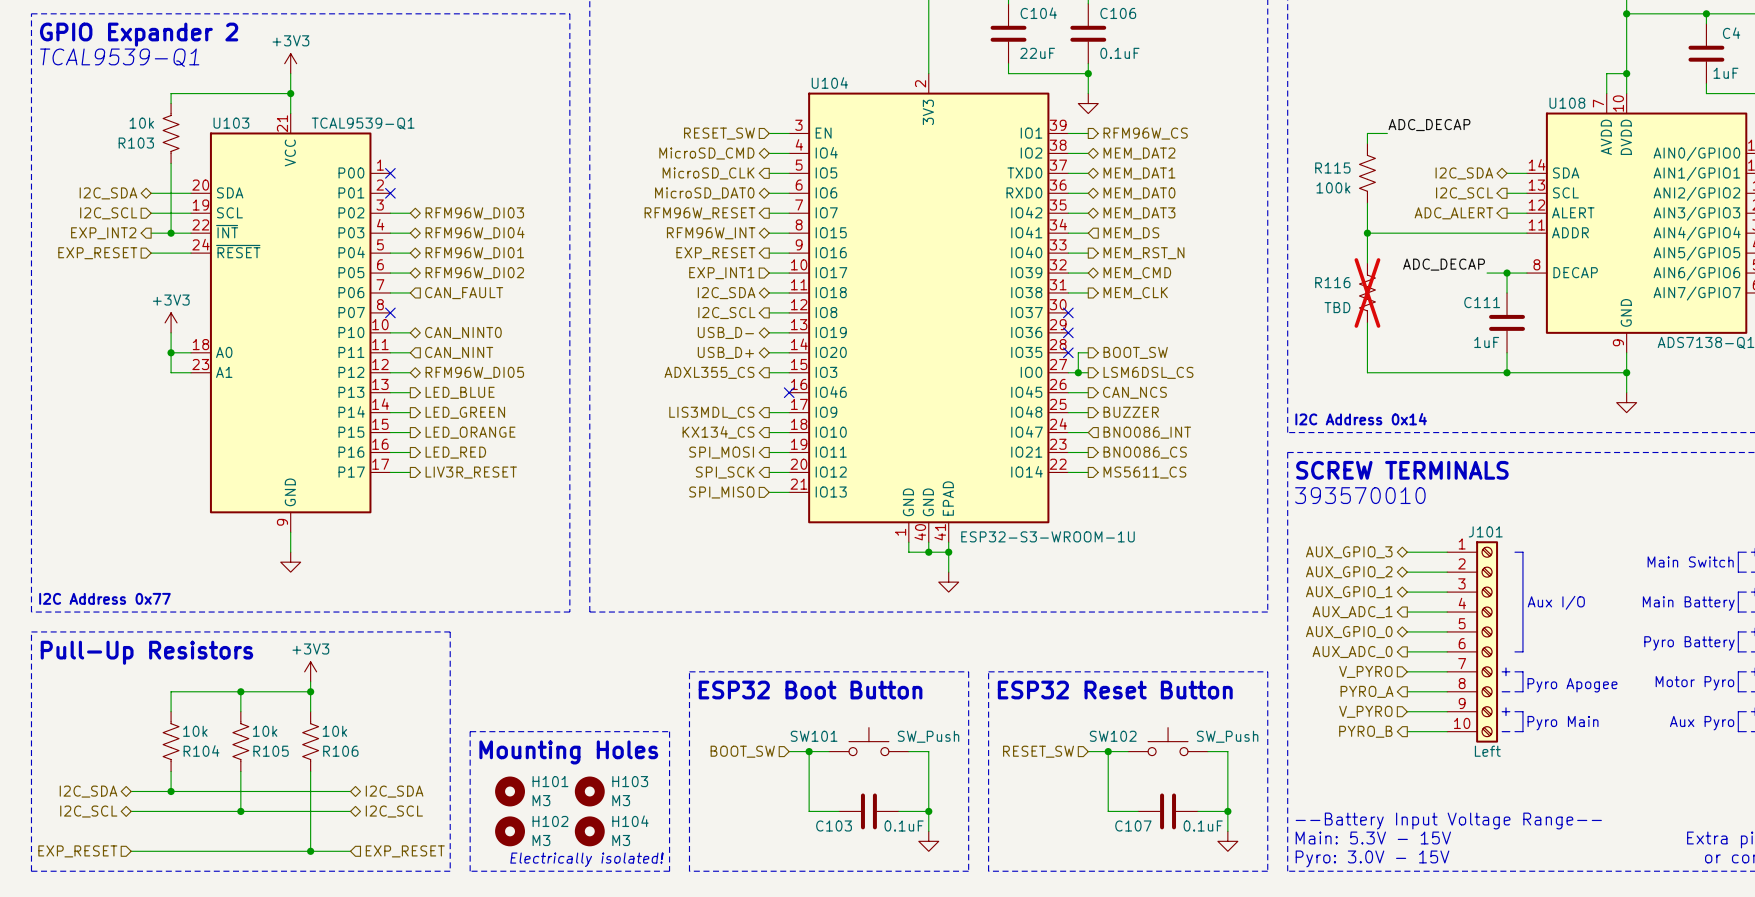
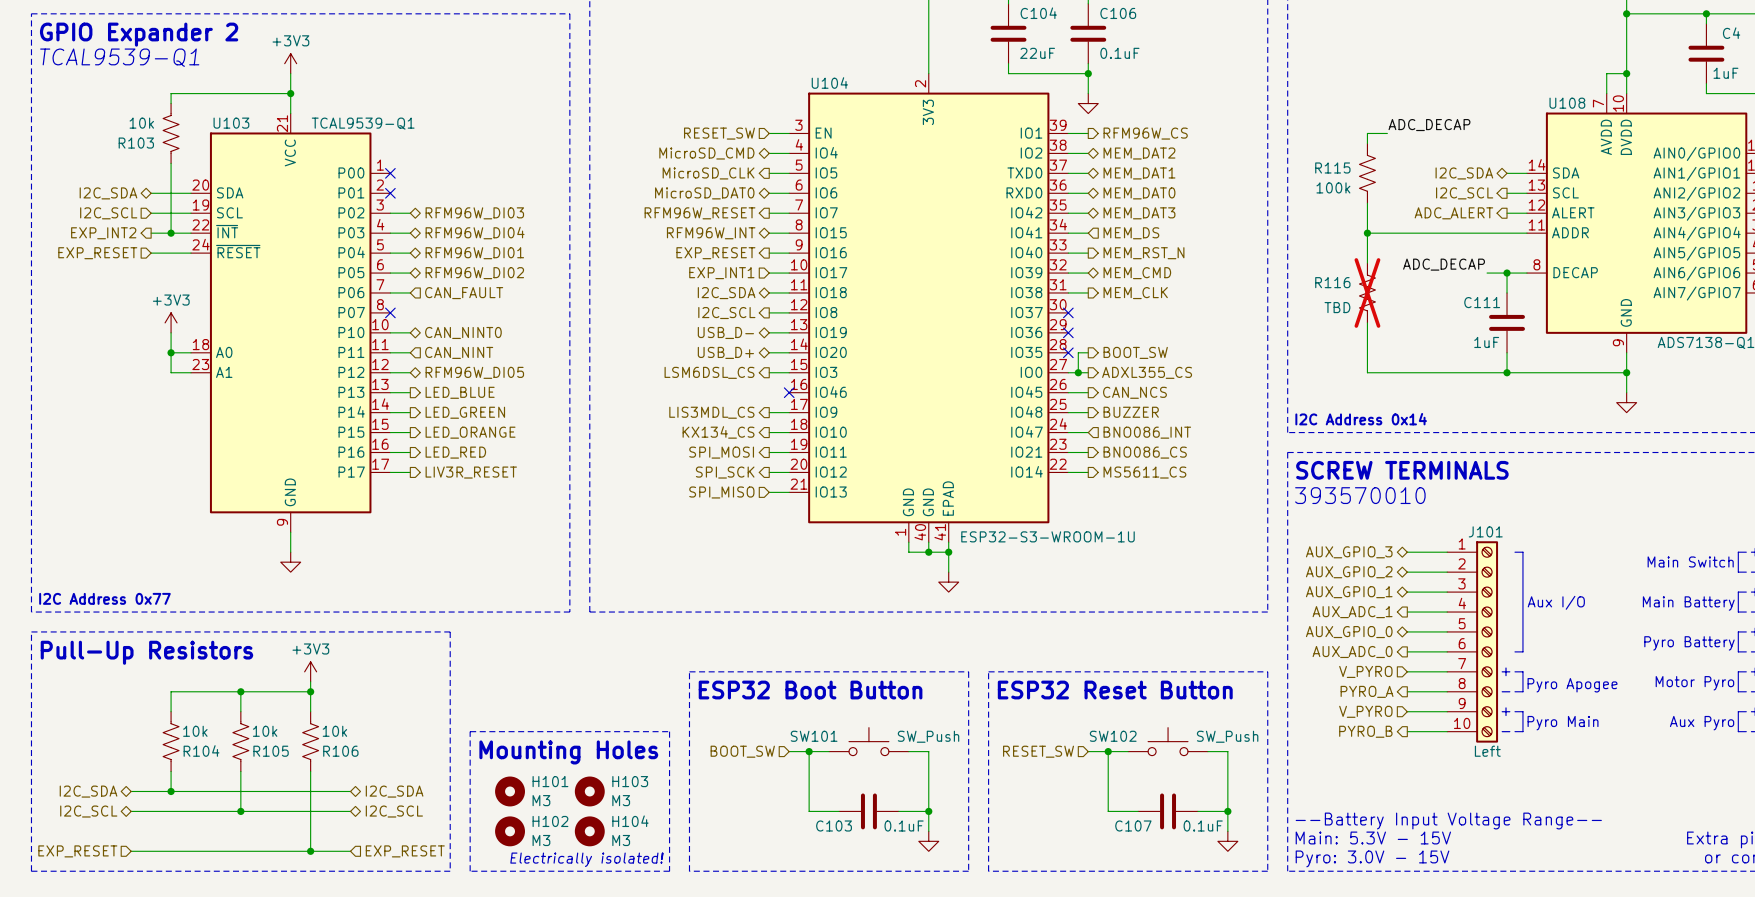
hierarchical label: ADXL355_CS (709, 372) -> LSM6DSL_CS (709, 372)
hierarchical label: LSM6DSL_CS (1148, 372) -> ADXL355_CS (1147, 372)

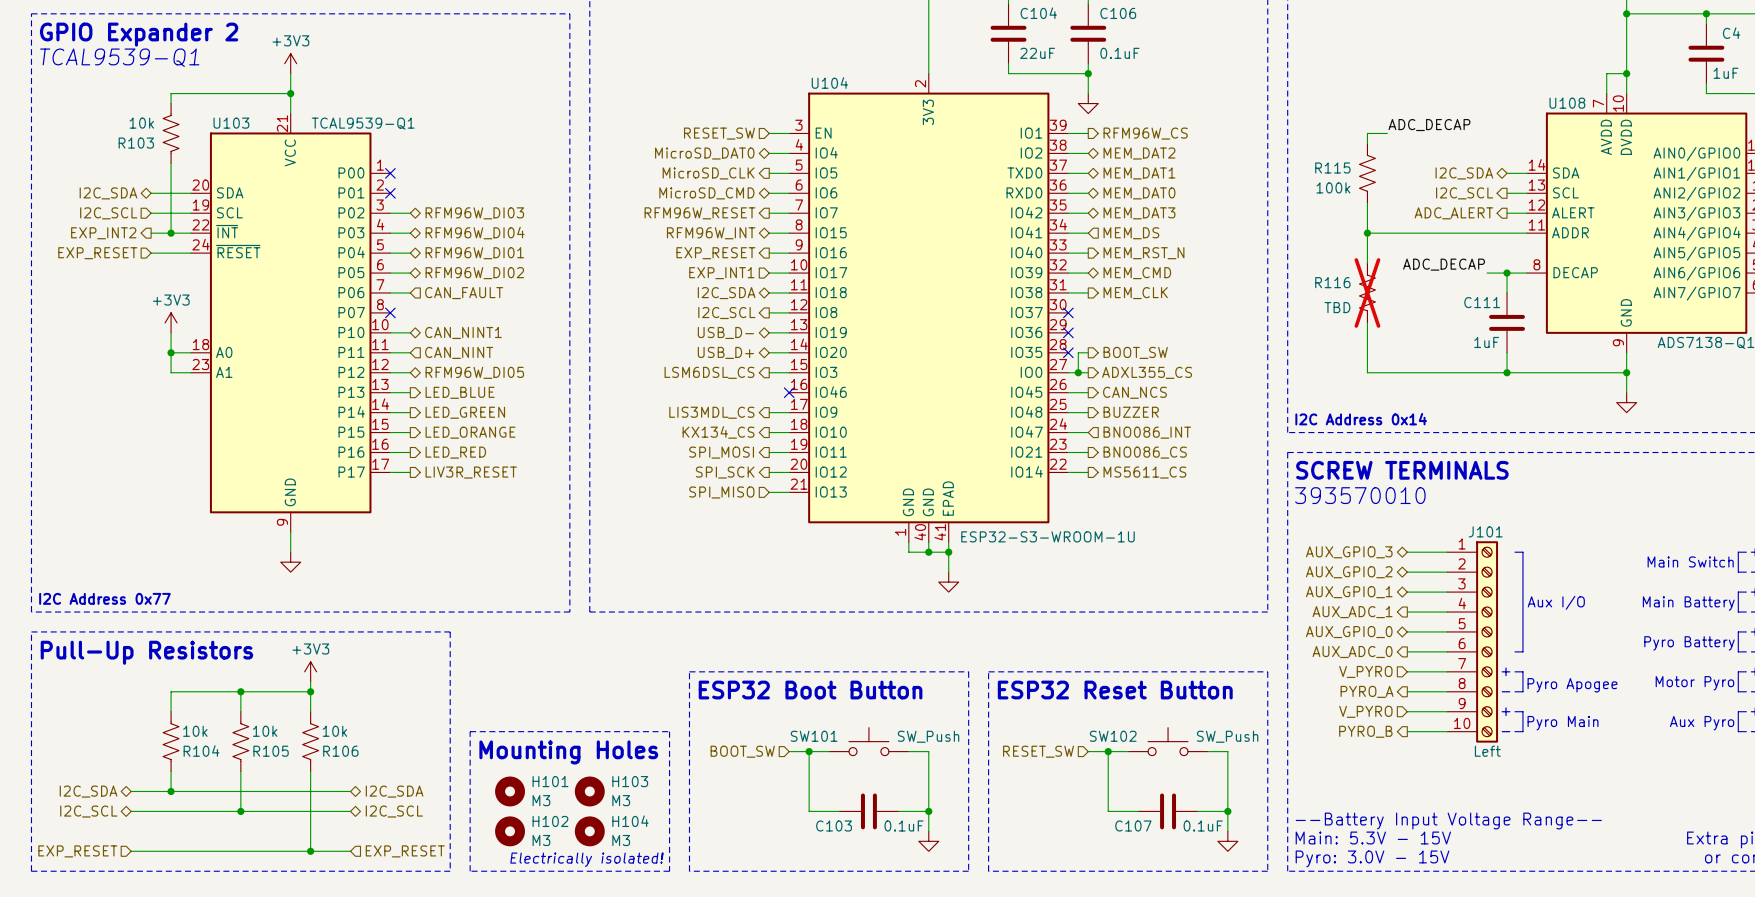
hierarchical label: MicroSD_CMD (706, 153) -> MicroSD_DAT0 (704, 153)
hierarchical label: MicroSD_DAT0 (704, 193) -> MicroSD_CMD (706, 193)
hierarchical label: CAN_NINT0 (463, 332) -> CAN_NINT1 (463, 332)

